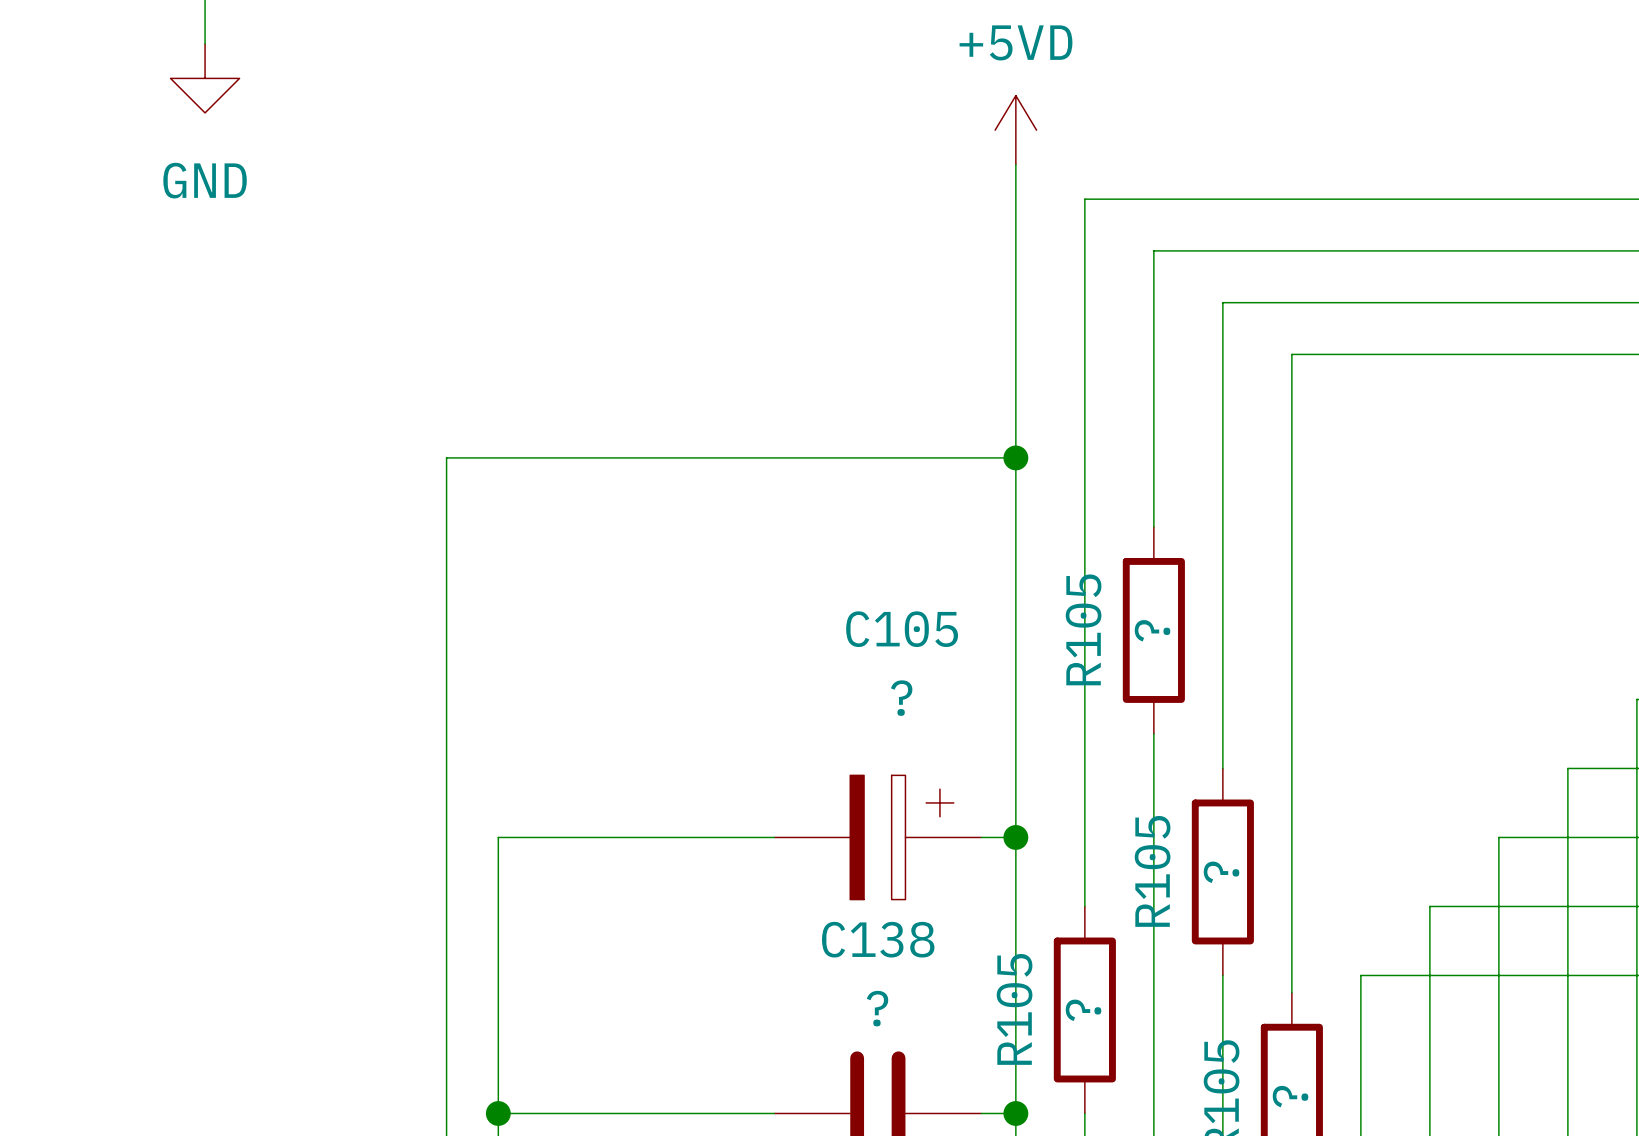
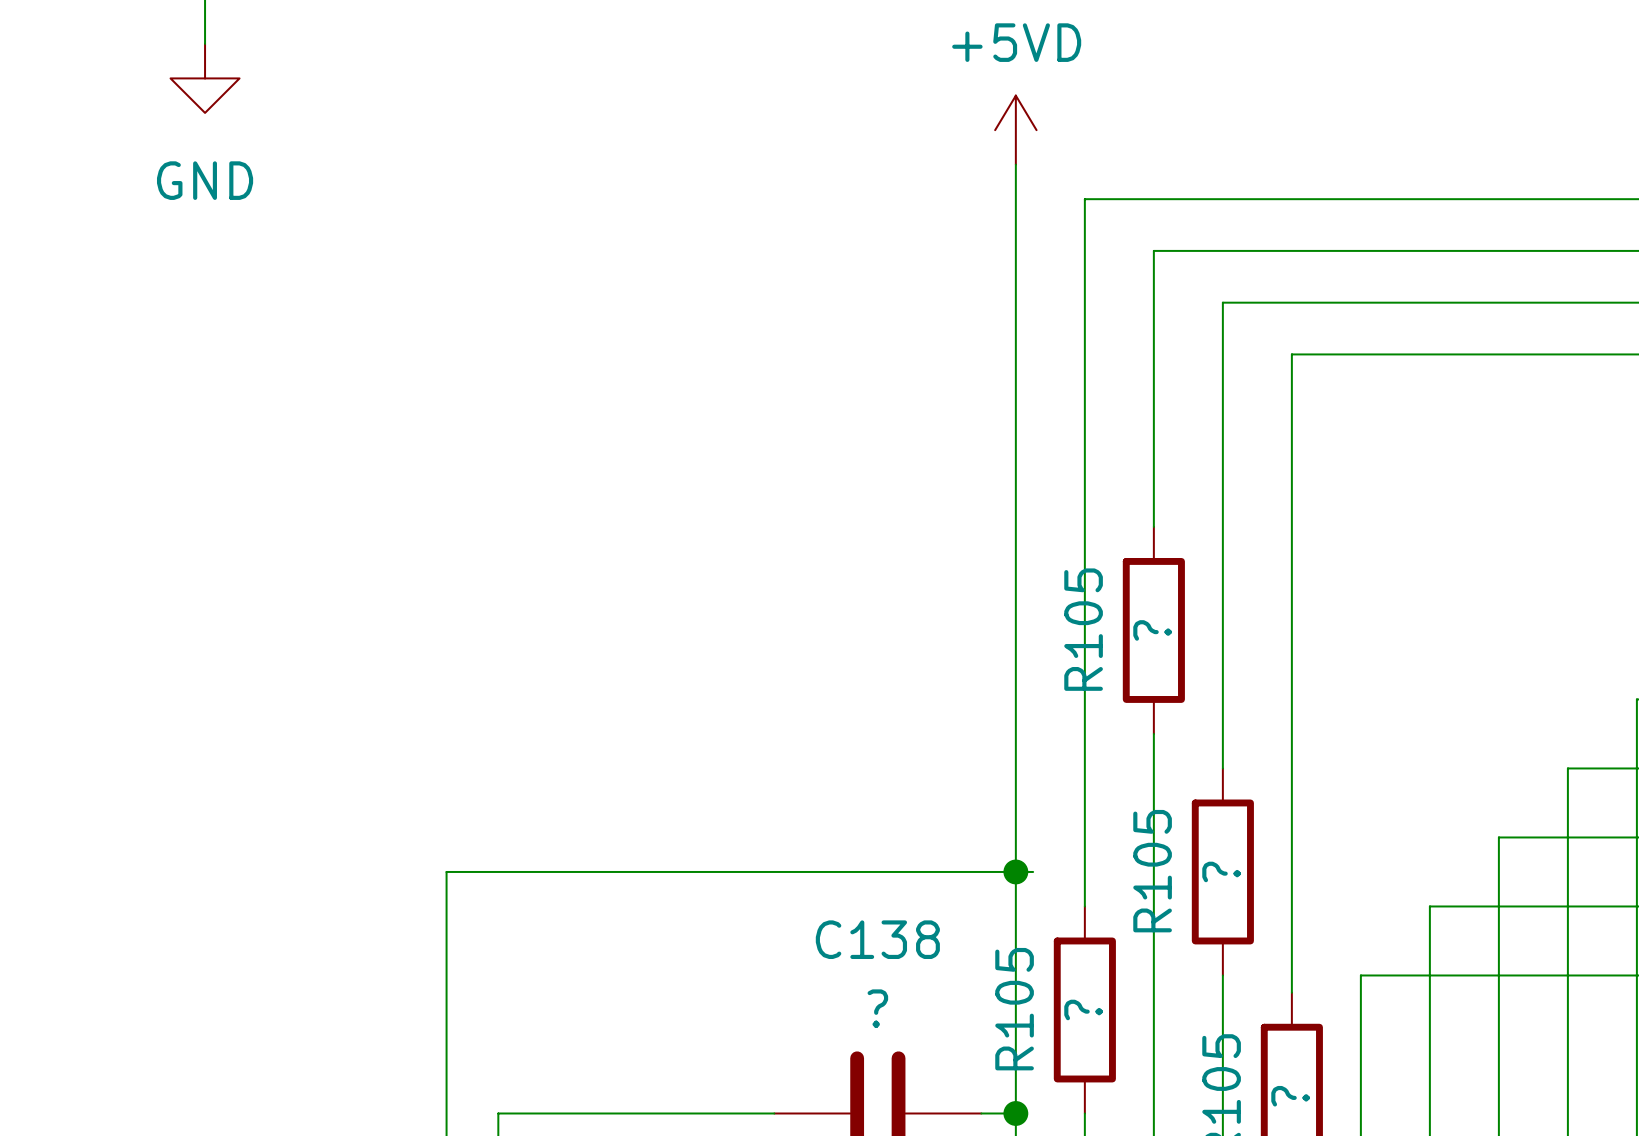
wire: (1015, 457) (446, 457) (446, 871) -> (1033, 871) (446, 871)
junction: (1015, 457) -> none
wire: (774, 837) (498, 837) (498, 1113) -> none
C105: ? (877, 837) -> none
wire: (981, 837) (1015, 837) -> none
junction position: (1015, 837) -> (1015, 871)
junction: (498, 1113) -> none

